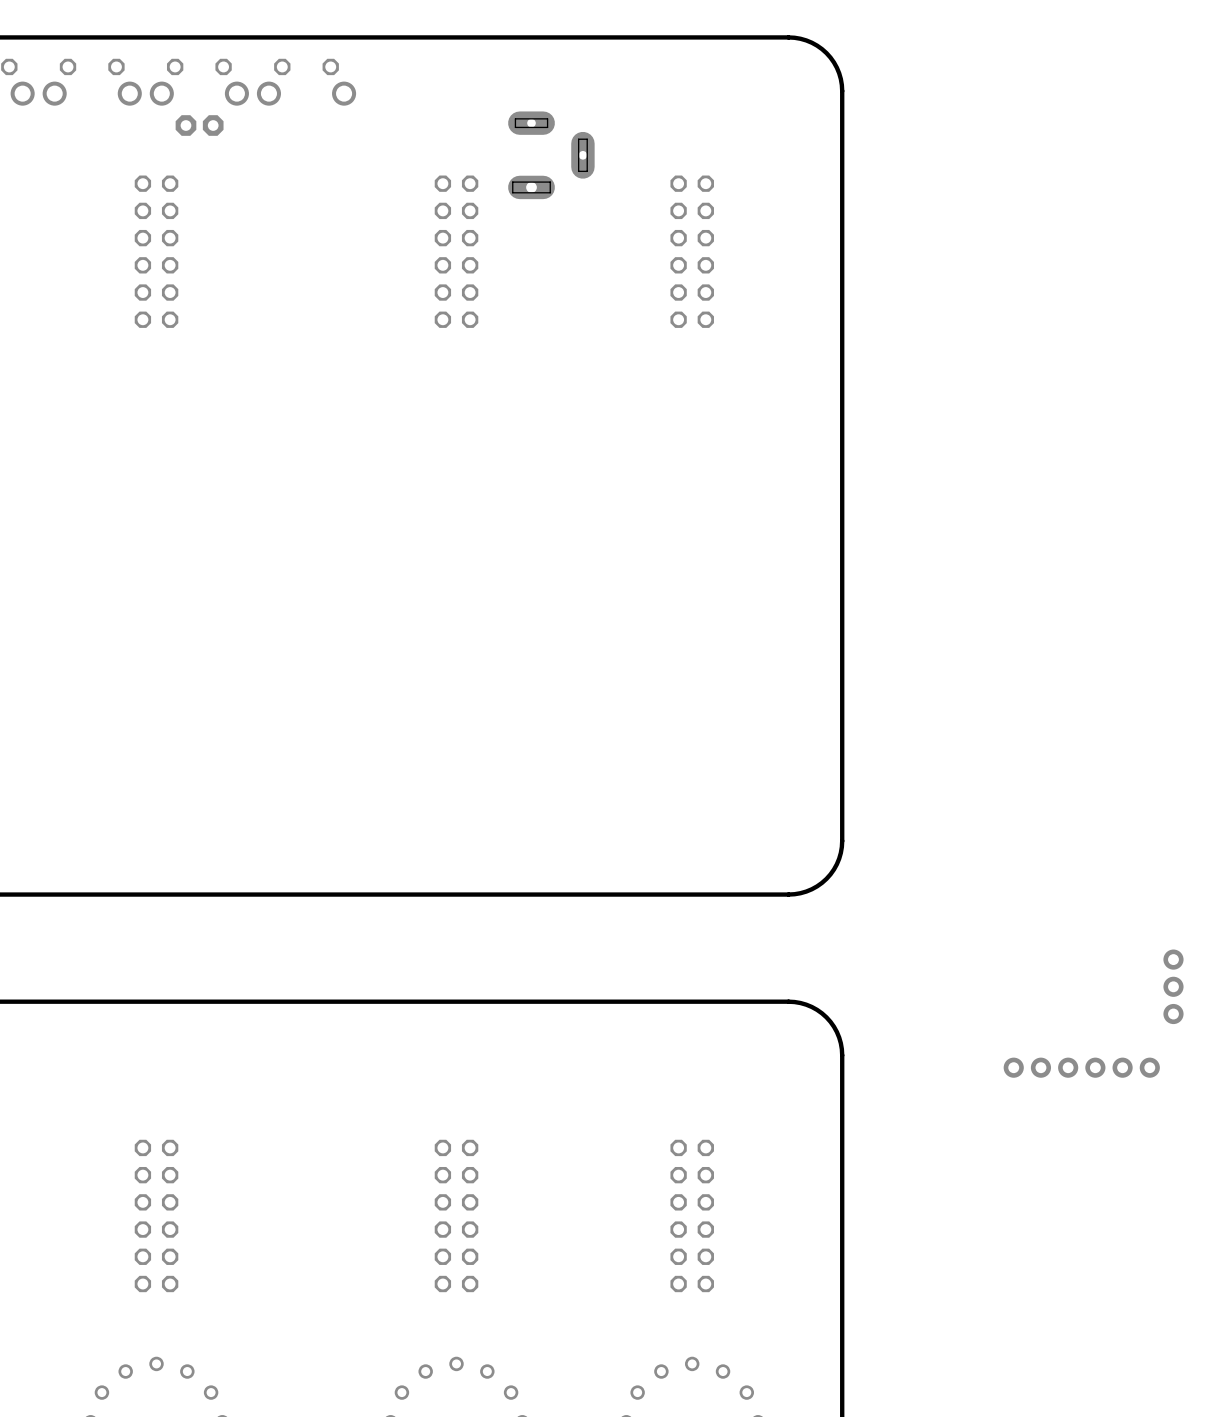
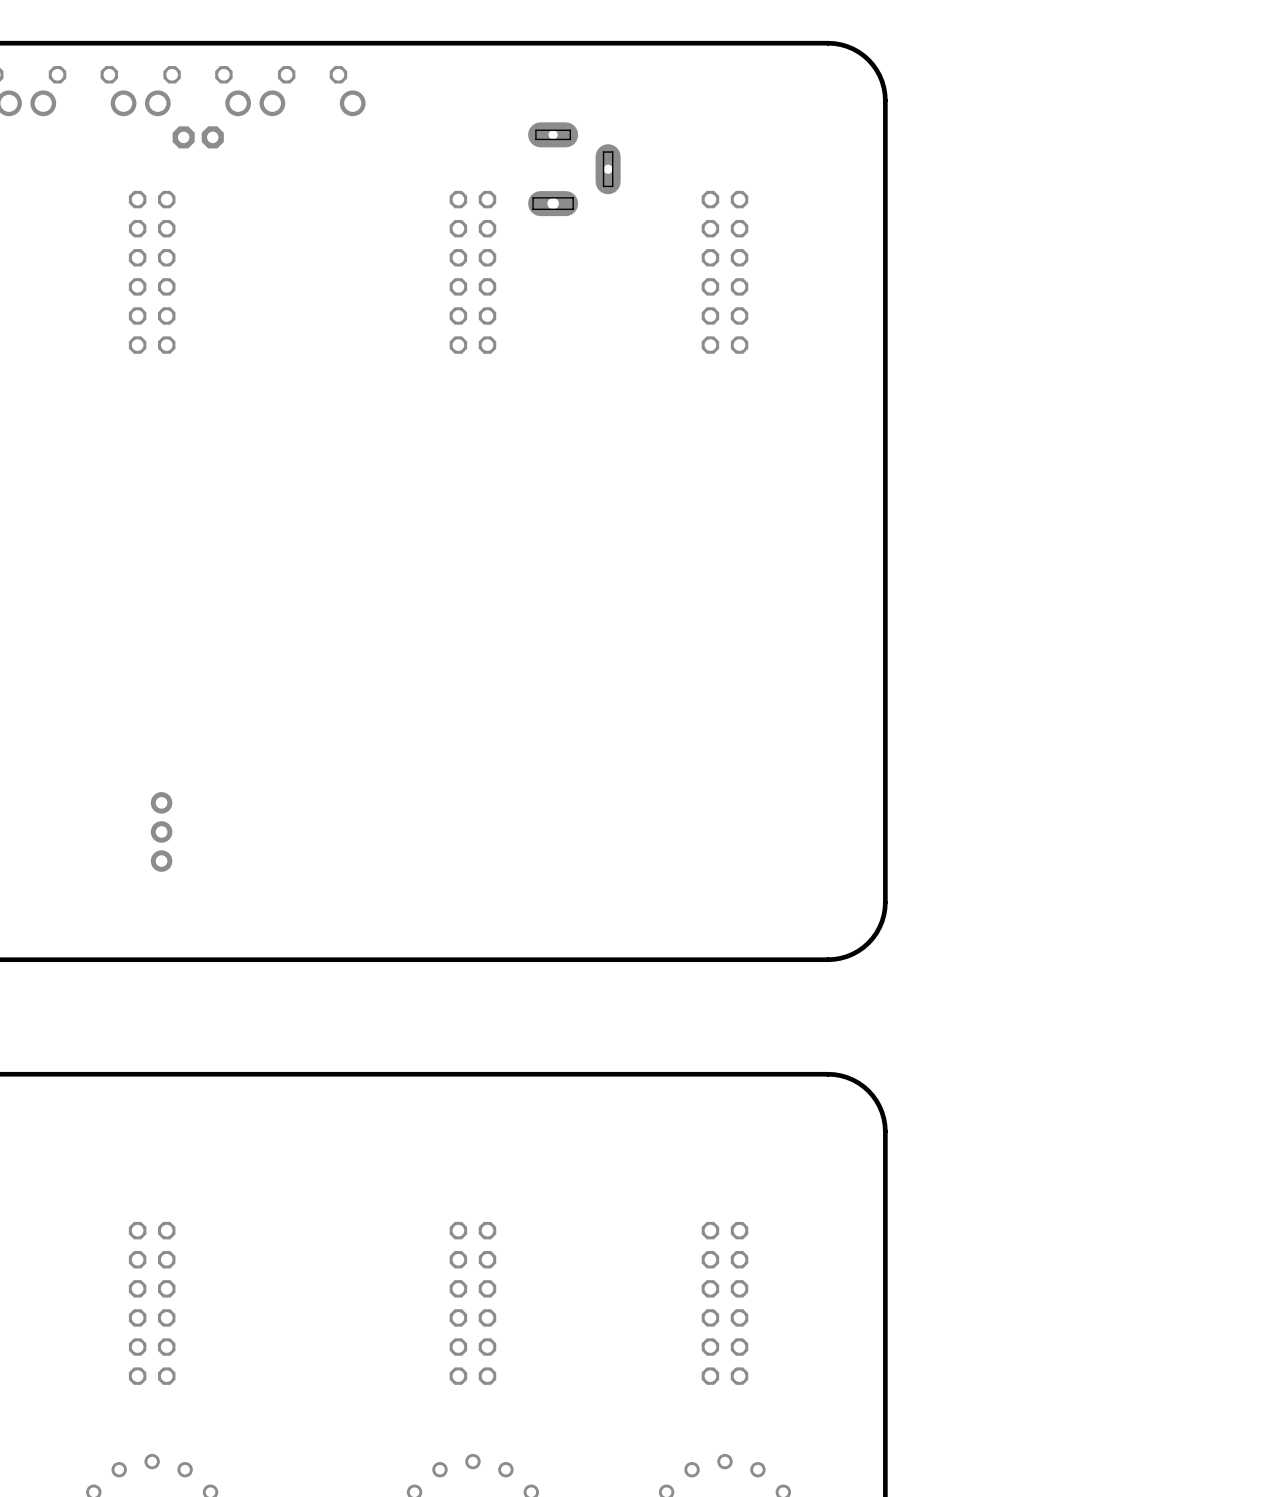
part: none -> (161, 831)
part: (1173, 986) -> none
part: (1081, 1067) -> none

